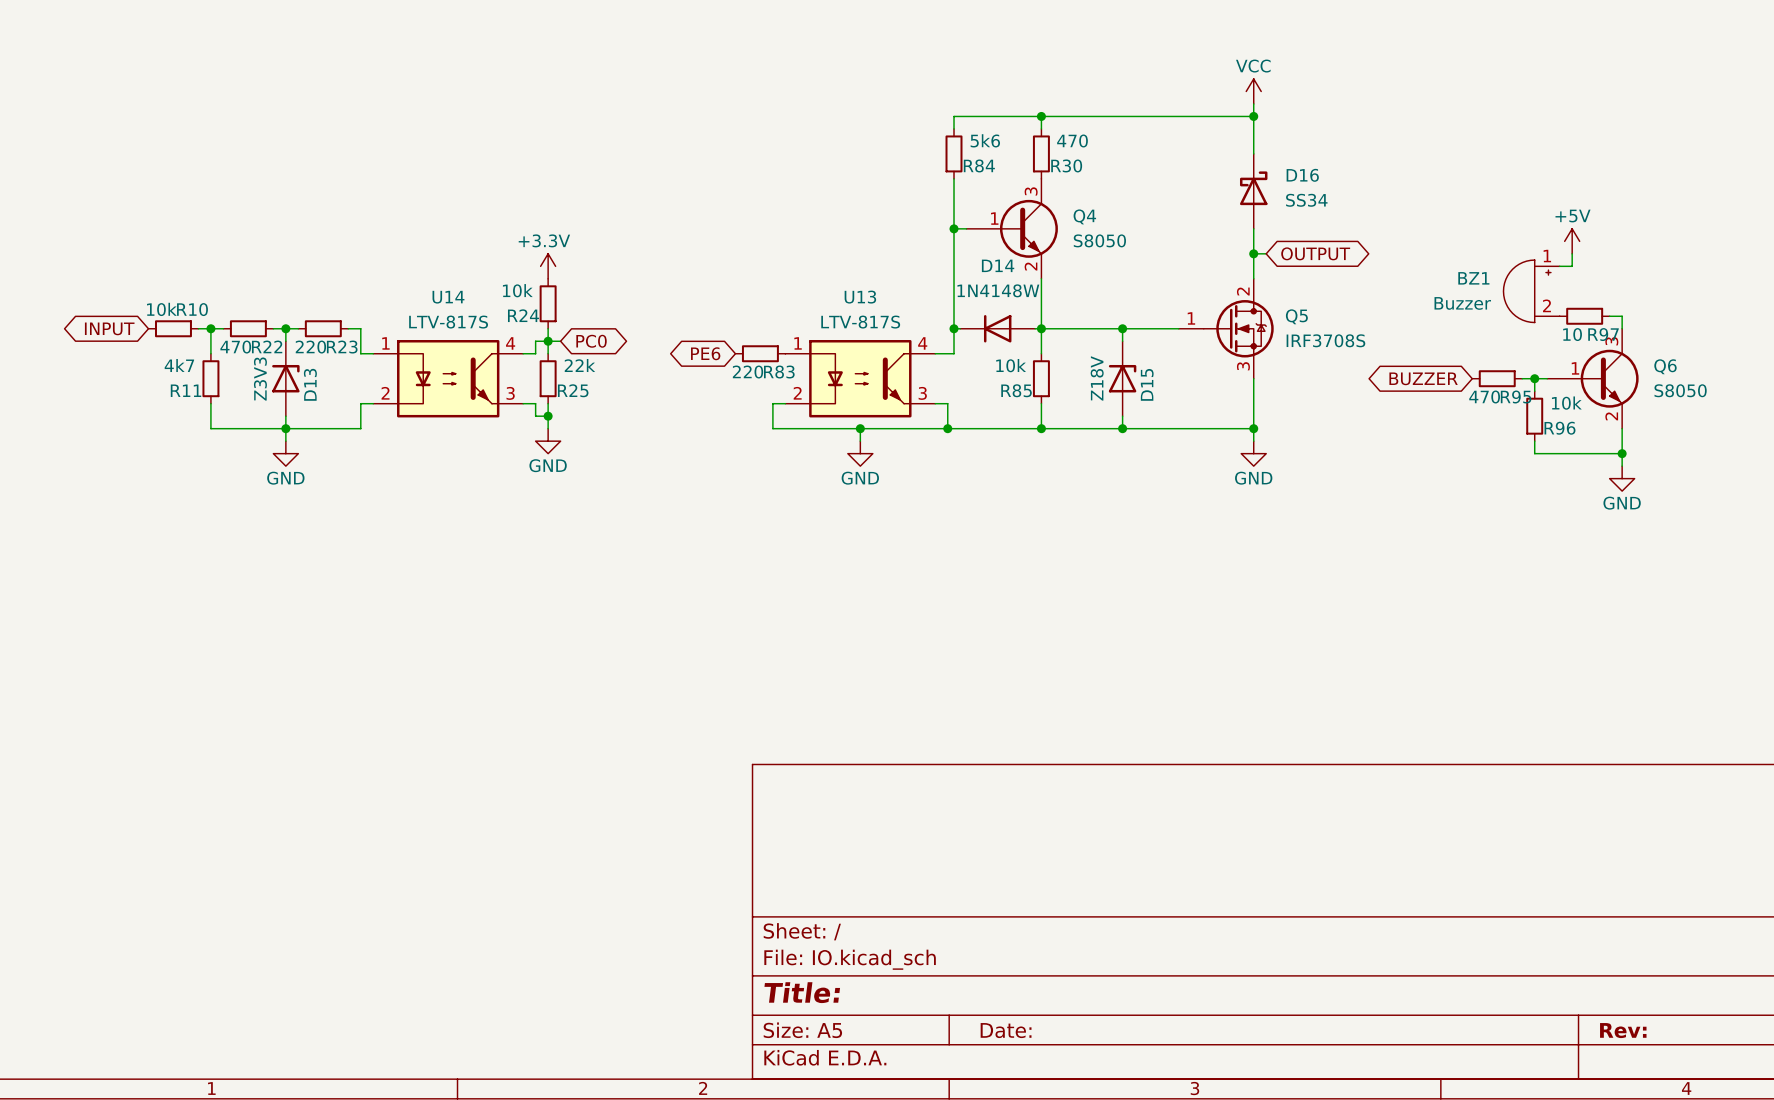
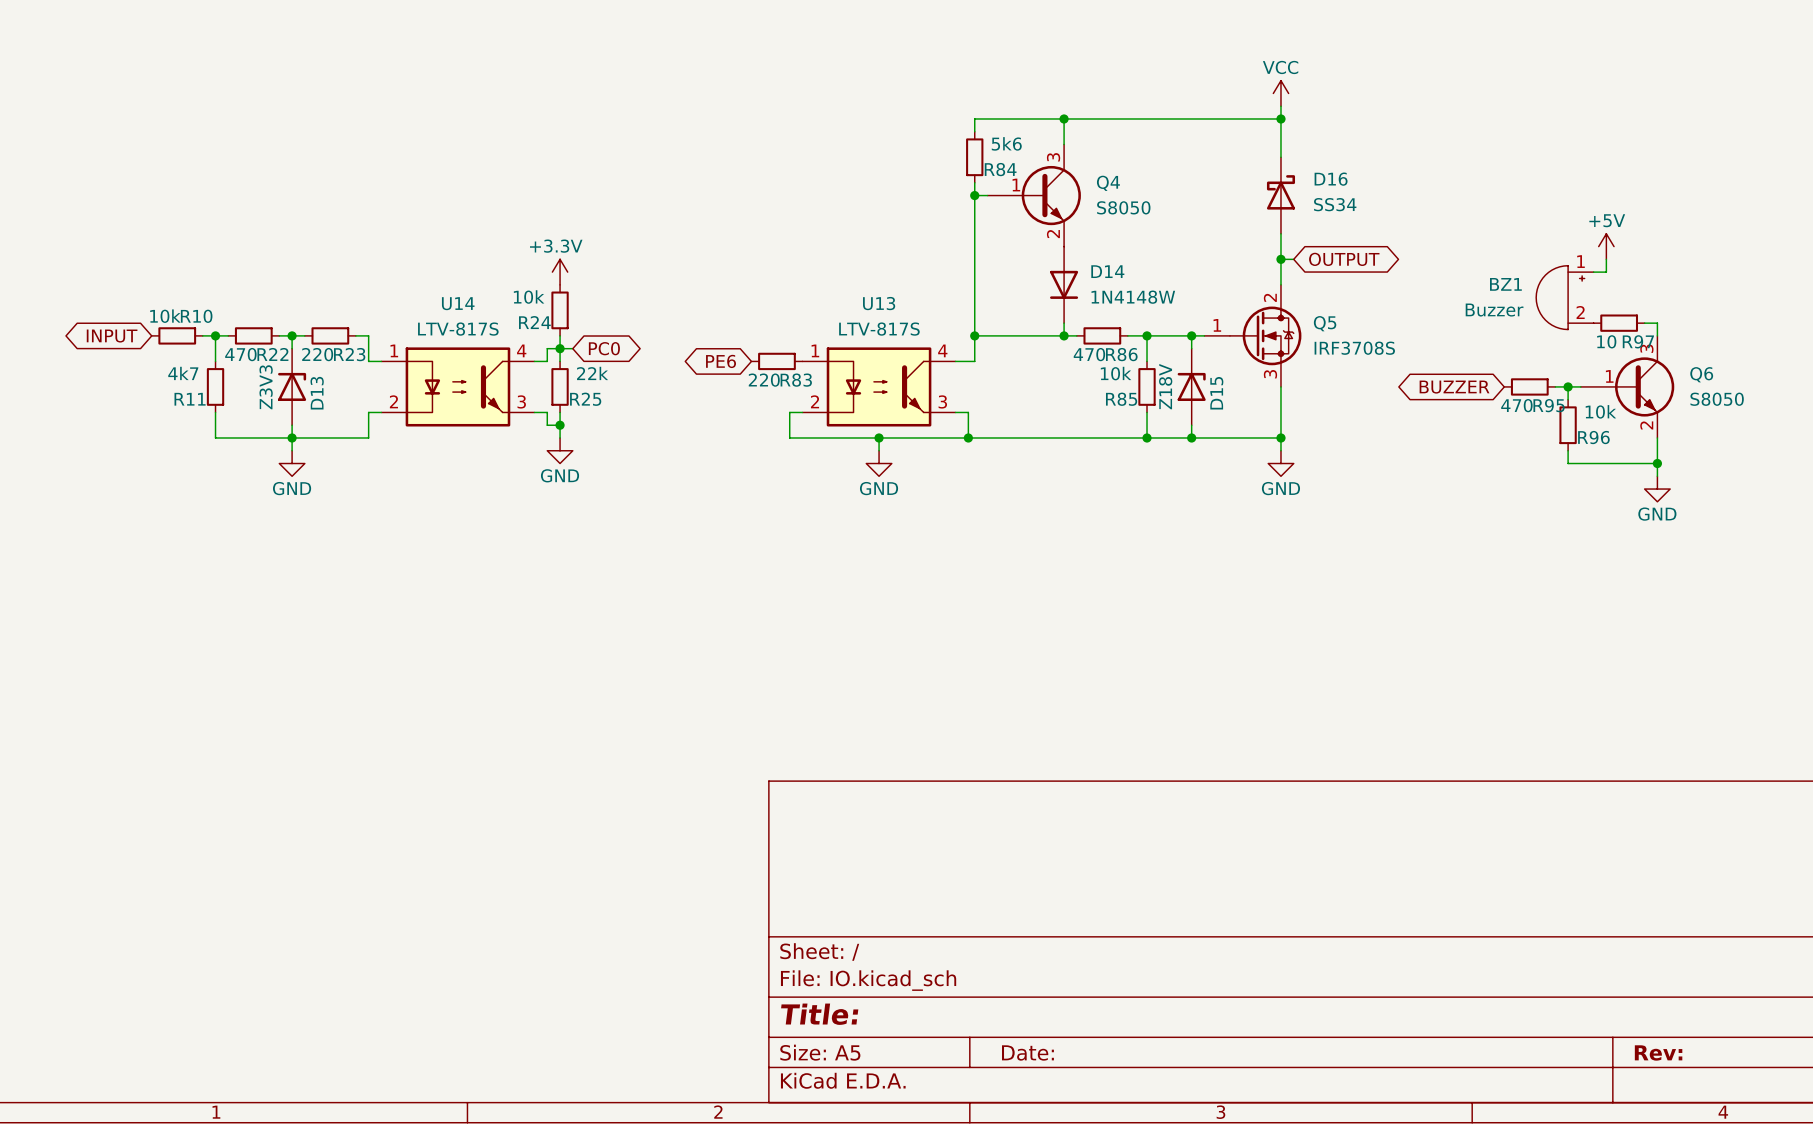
R30: 470 (1041, 153) -> none
wire: (954, 228) (966, 228) -> (974, 195) (987, 195)
junction position: (954, 228) -> (974, 195)
Q4 position: (1012, 228) -> (1034, 195)
D14 name position: D14 (998, 265) -> D14 (1107, 271)
D14 value position: 1N4148W (998, 290) -> 1N4148W (1133, 297)
D14 rotation: 0° (997, 328) -> 90° counterclockwise (1064, 284)
D14 position: (997, 328) -> (1064, 284)
wire: (1041, 328) (1041, 353) -> none
wire: (1053, 328) (1103, 328) -> none
R86: none -> 470 (1102, 335)
wire: none -> (1191, 335) (1191, 348)
junction: none -> (1191, 335)
R85 position: (1041, 378) -> (1147, 386)
D15 position: (1122, 378) -> (1191, 386)
wire: (1041, 403) (1041, 428) -> none
wire: none -> (1191, 425) (1191, 437)
junction: (1041, 428) -> none
junction: none -> (1191, 437)

